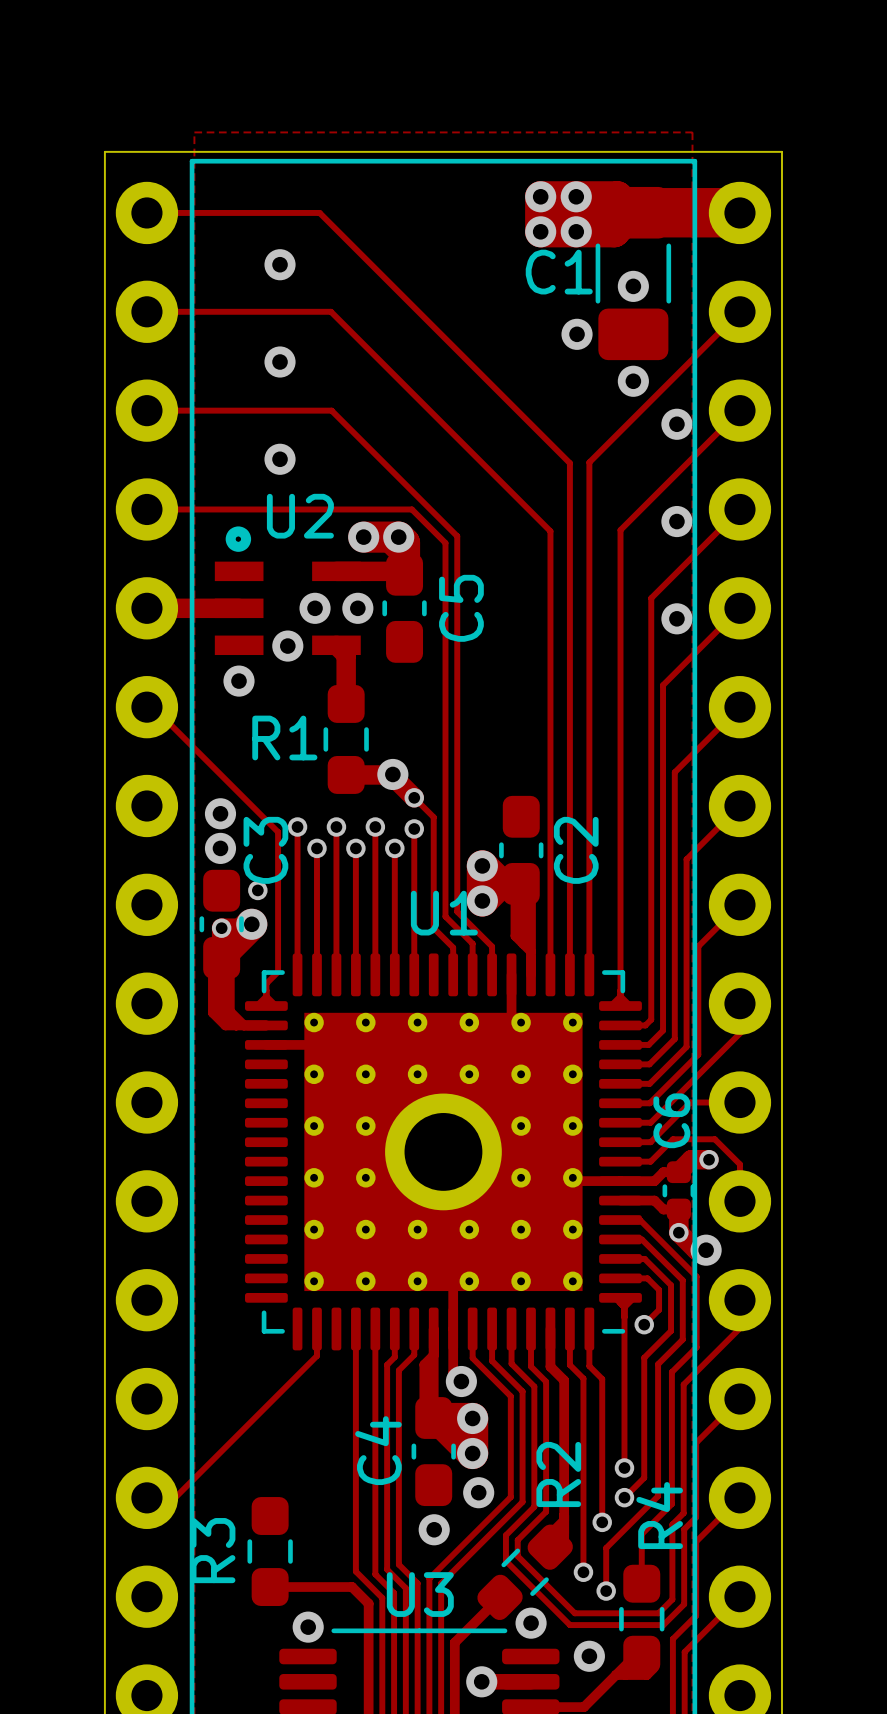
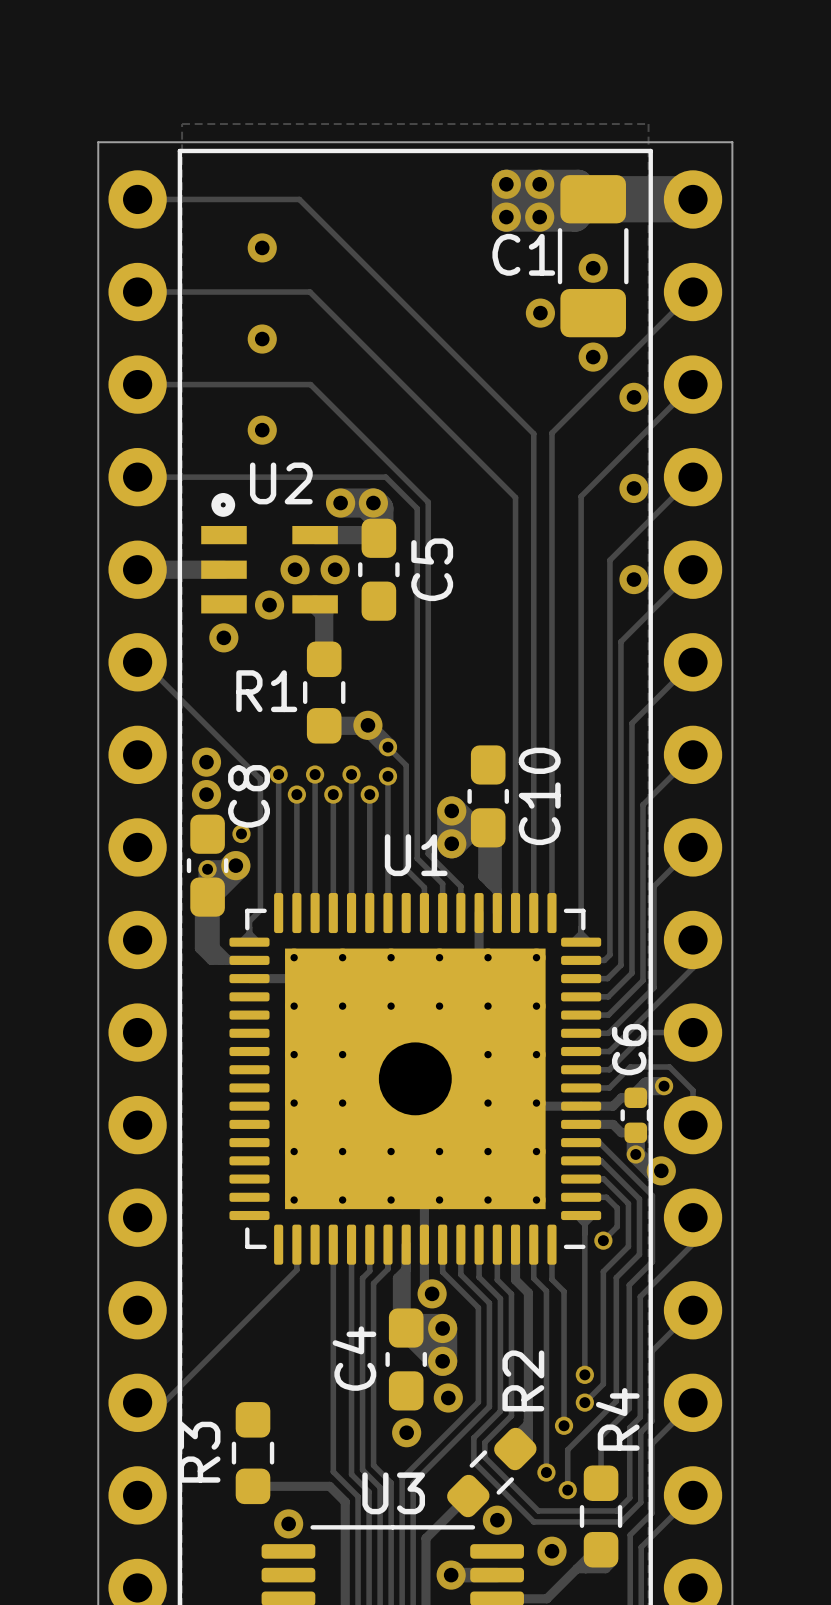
C3 name: C3 (265, 850) -> C8 (249, 796)
C2 name: C2 (576, 850) -> C10 (539, 796)

